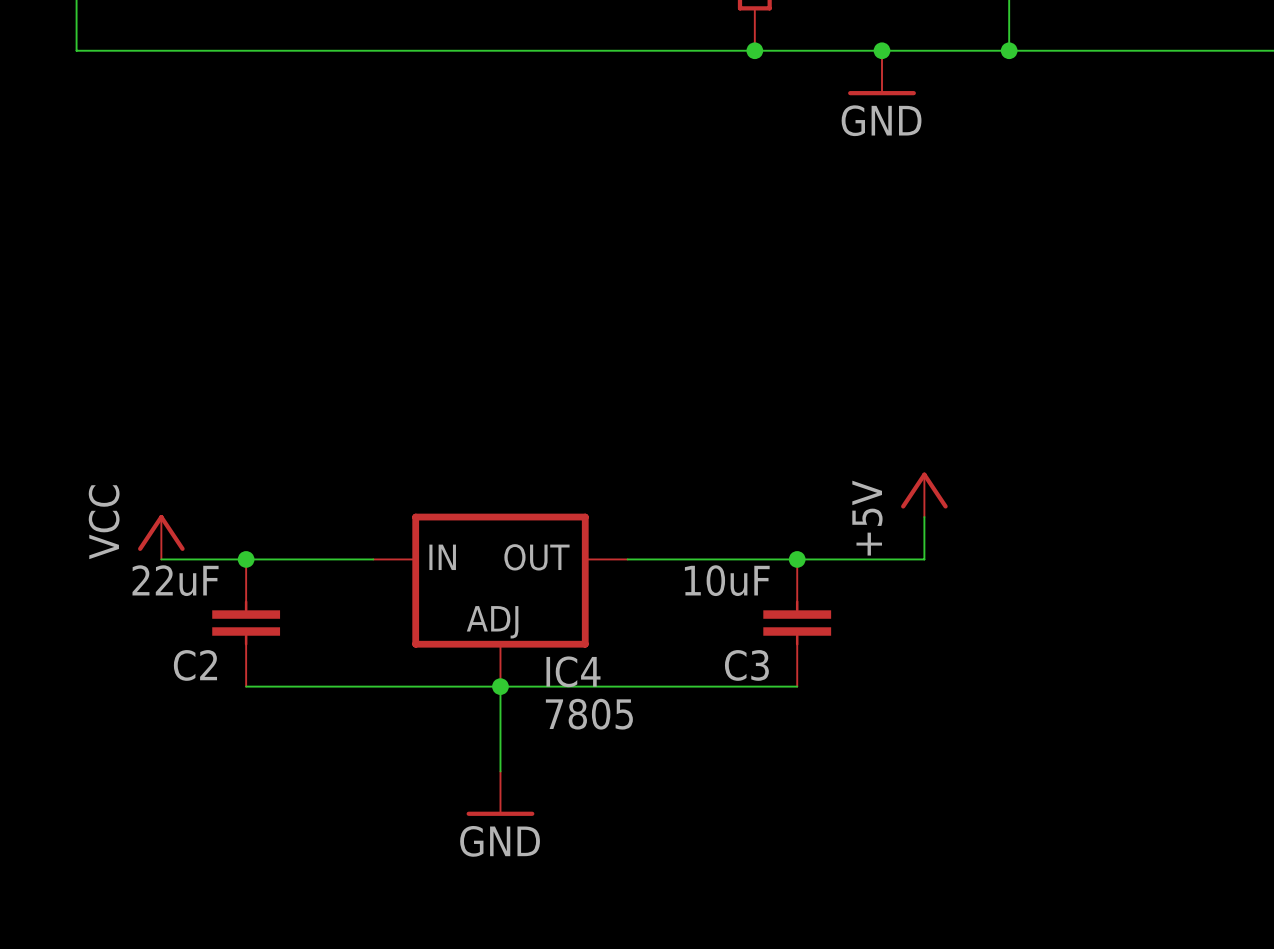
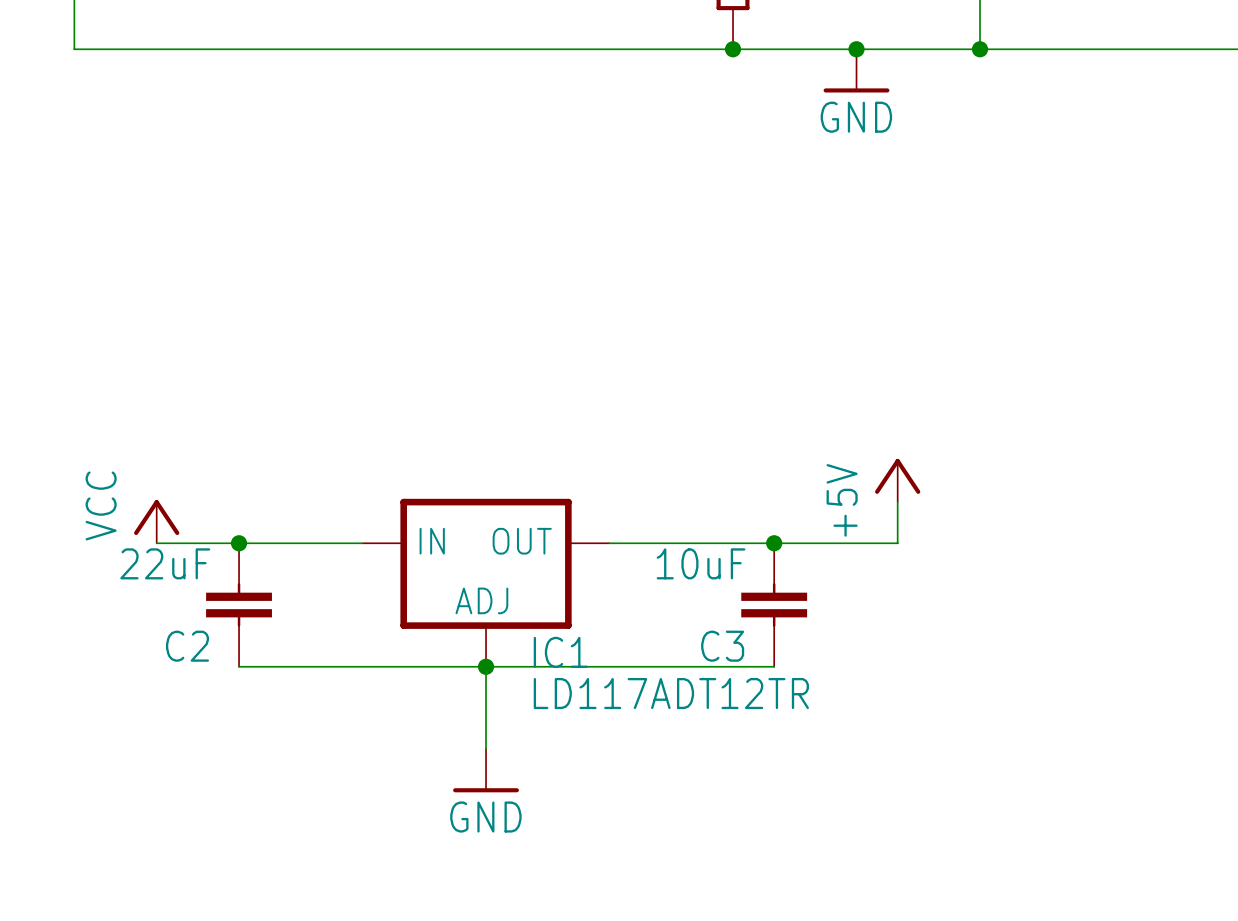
IC4 name: IC4 (573, 671) -> IC1 (560, 652)
IC4 value: 7805 (589, 714) -> LD117ADT12TR (671, 693)

